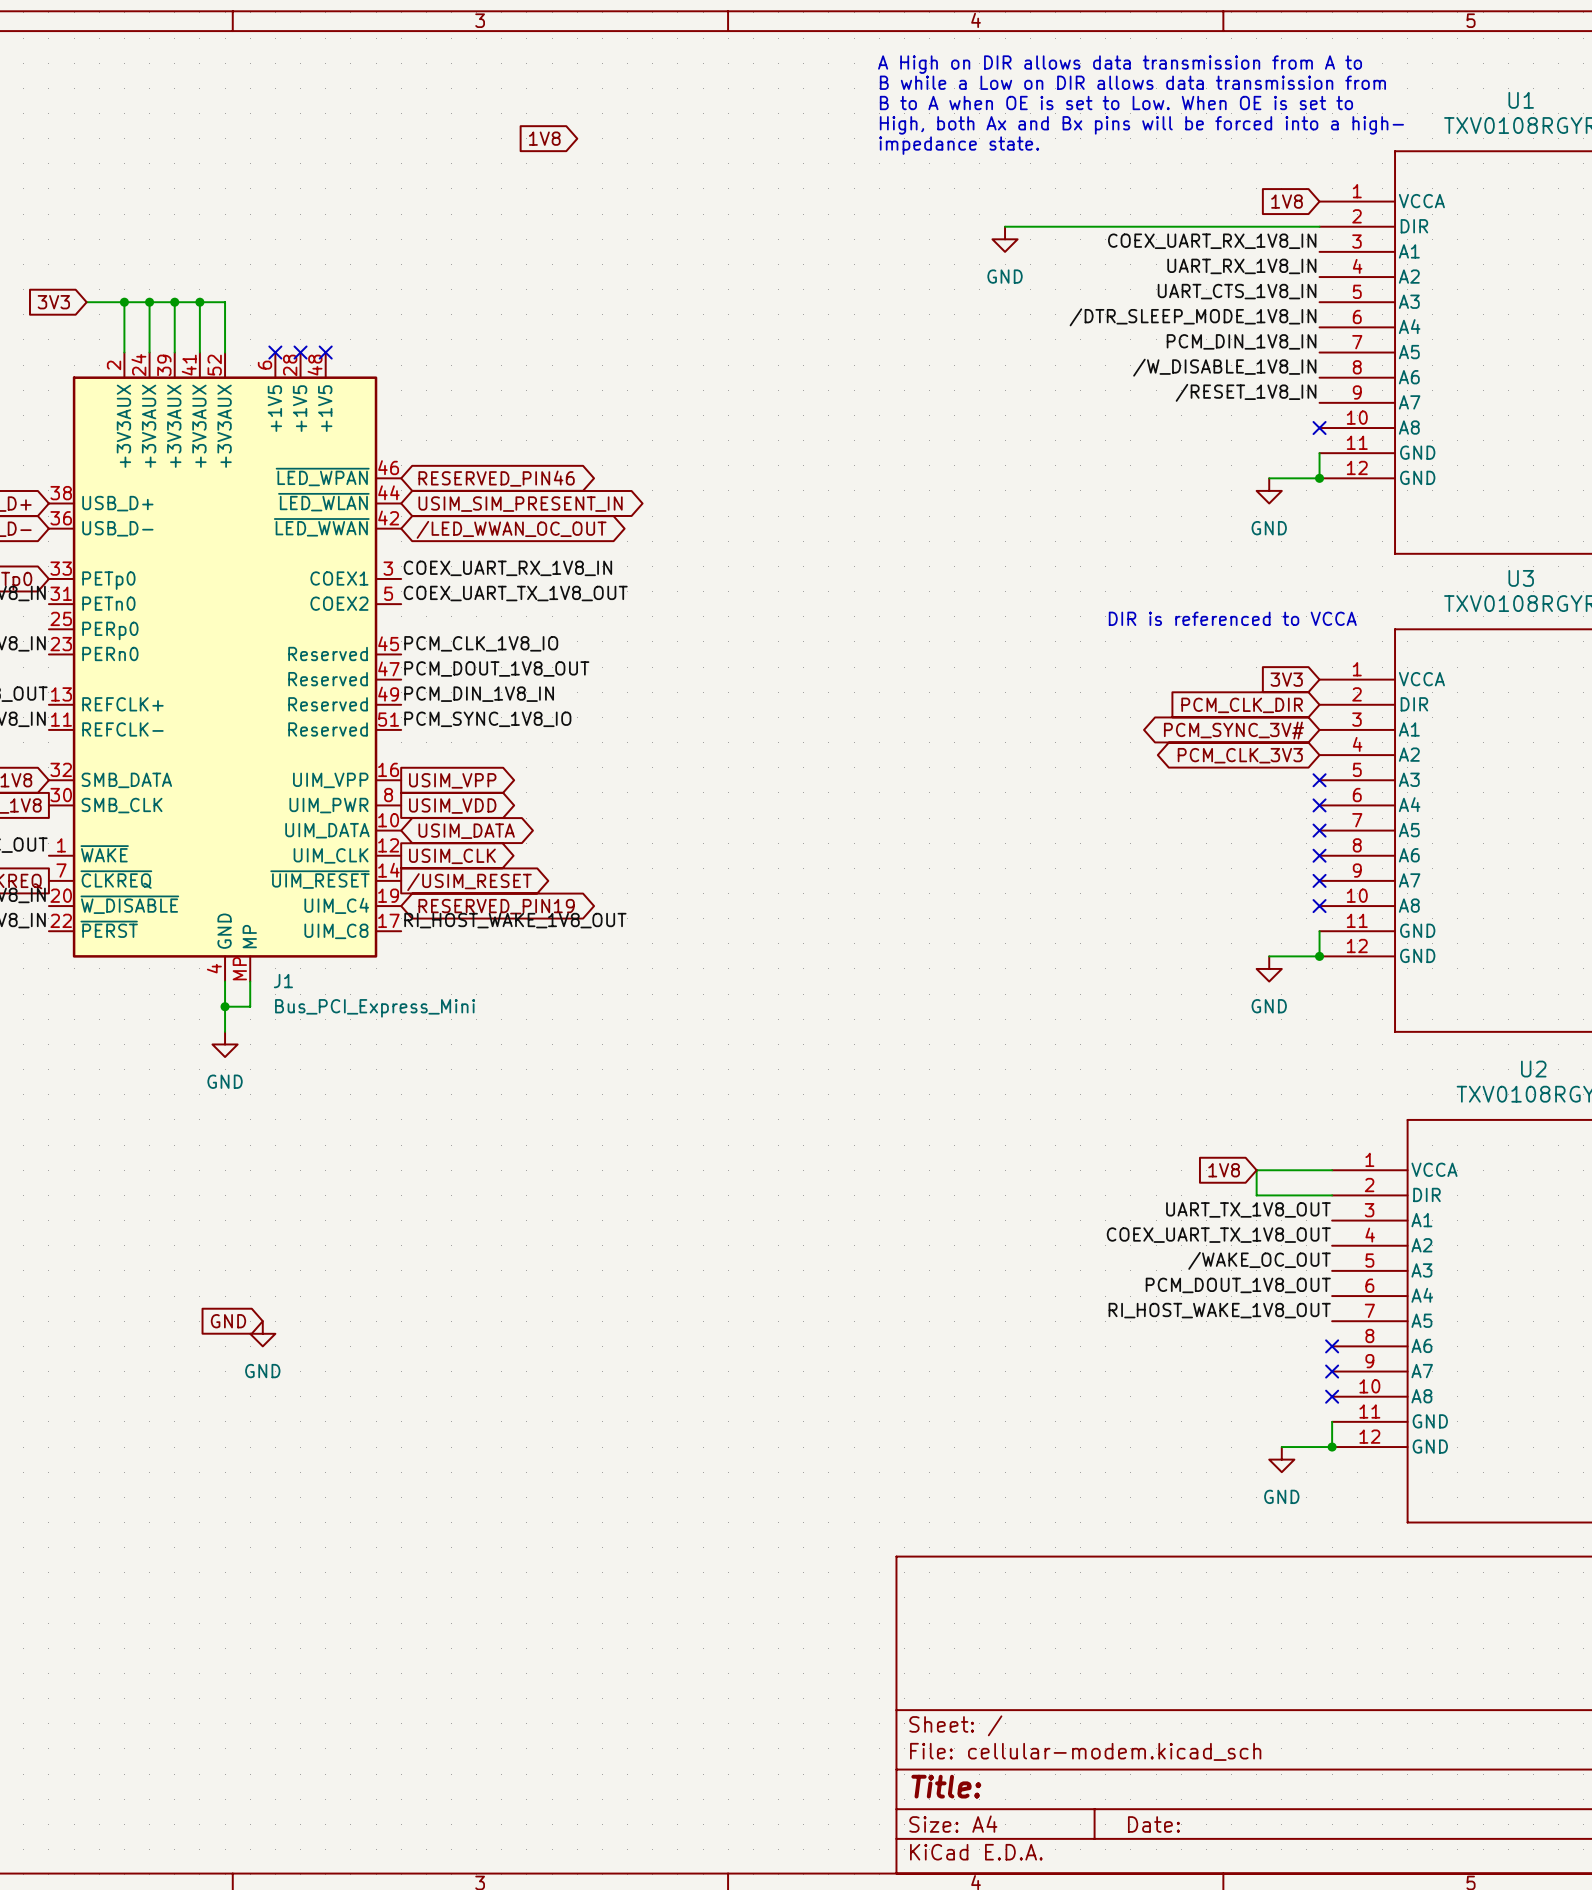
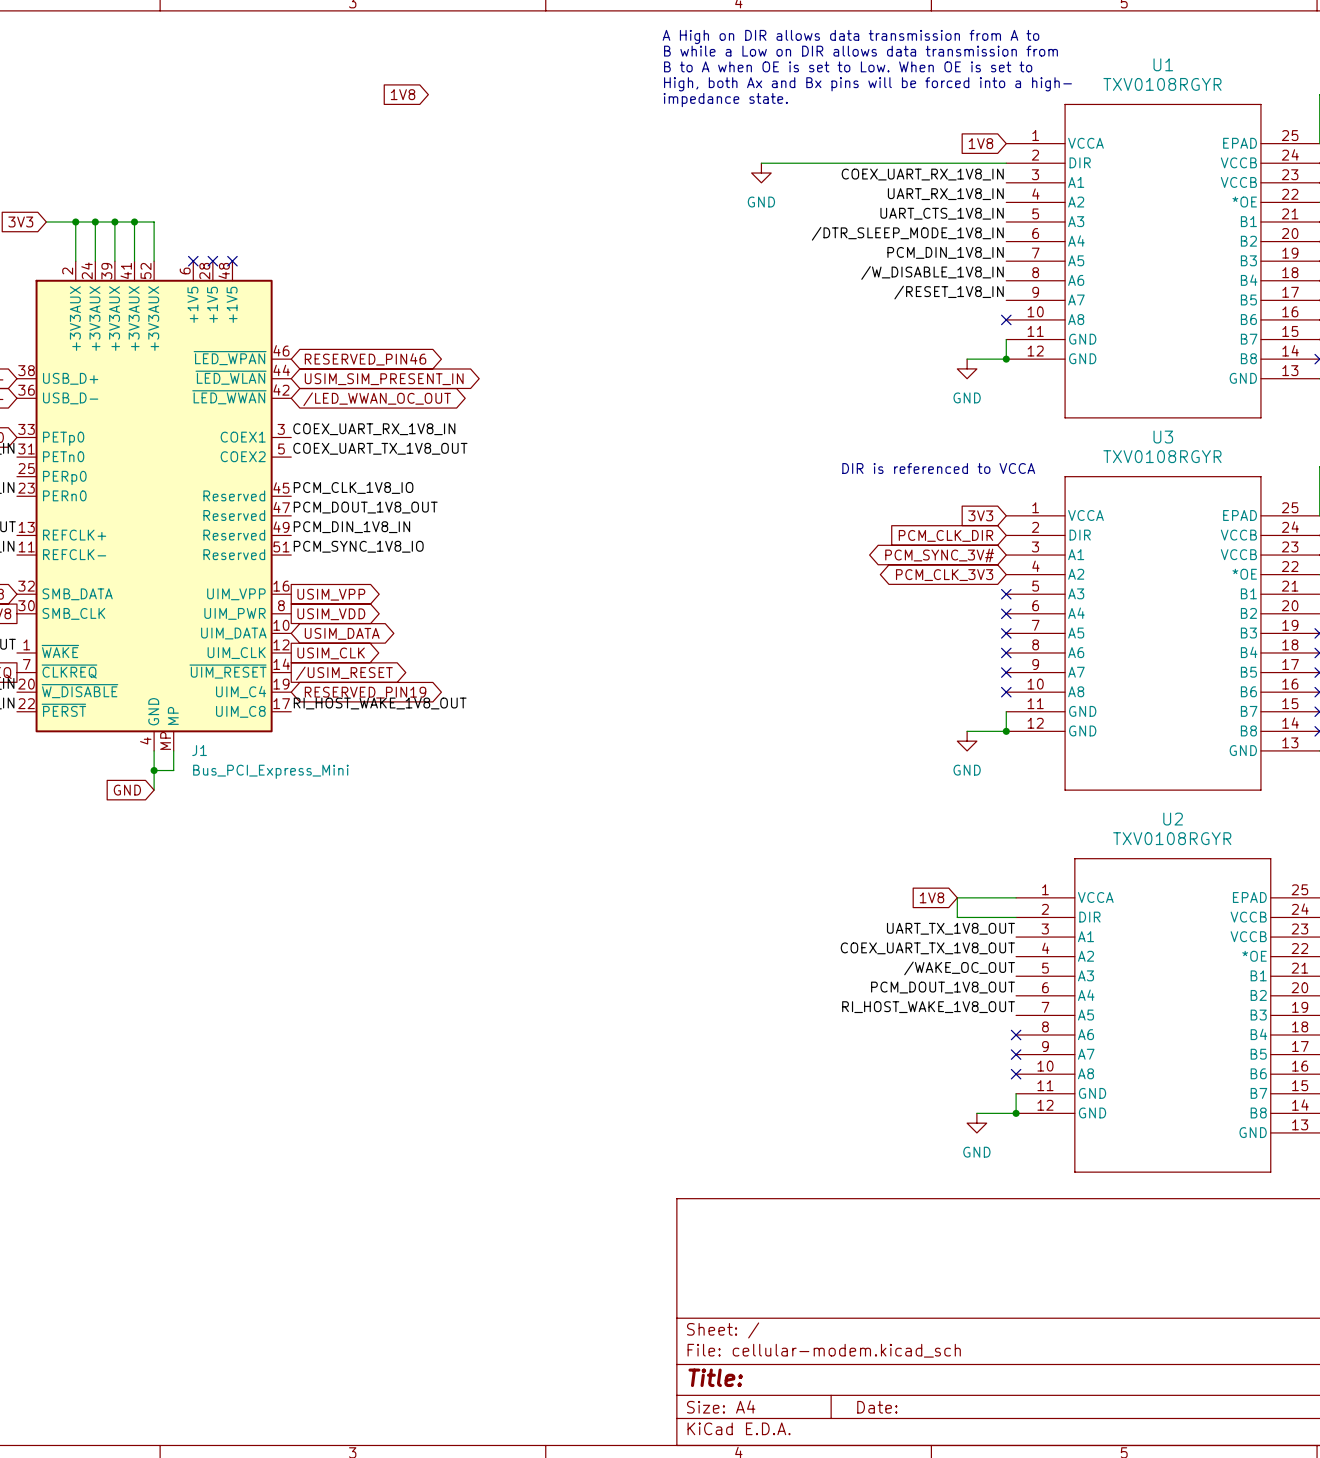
global label: none -> GND (127, 790)
power symbol: GND (225, 1044) -> none
global label: GND (228, 1321) -> none
power symbol: GND (262, 1333) -> none

